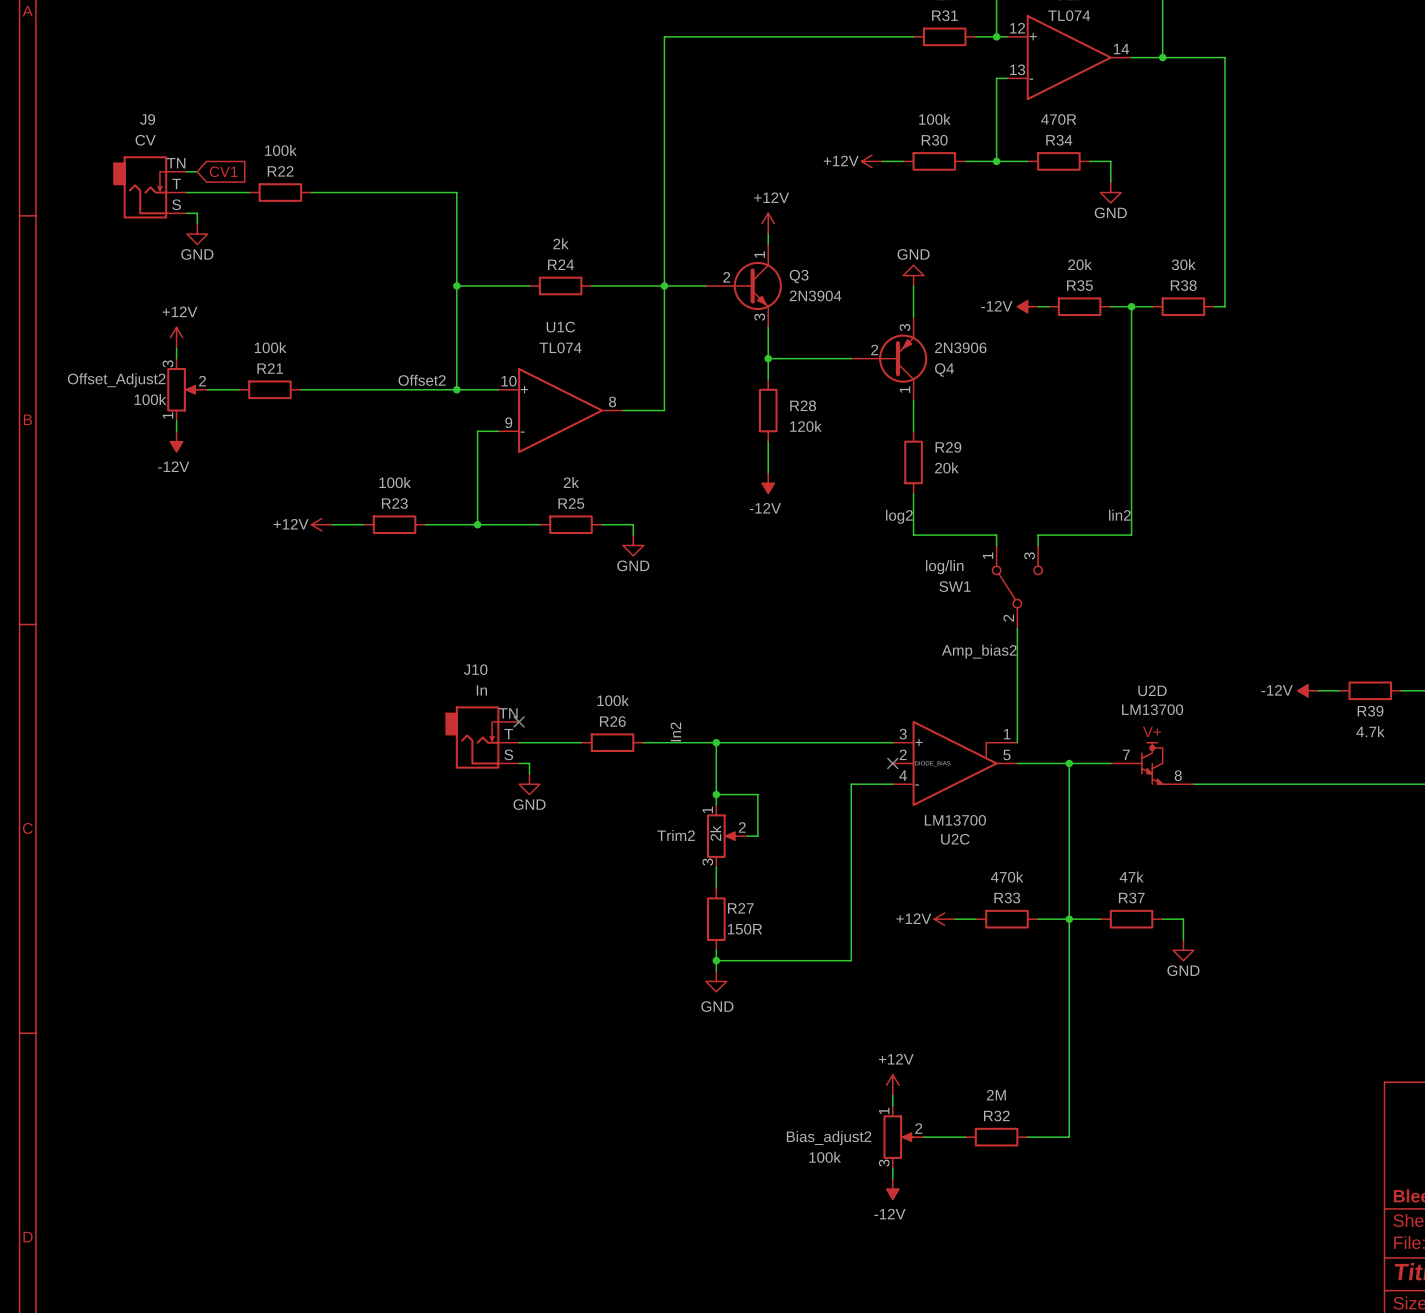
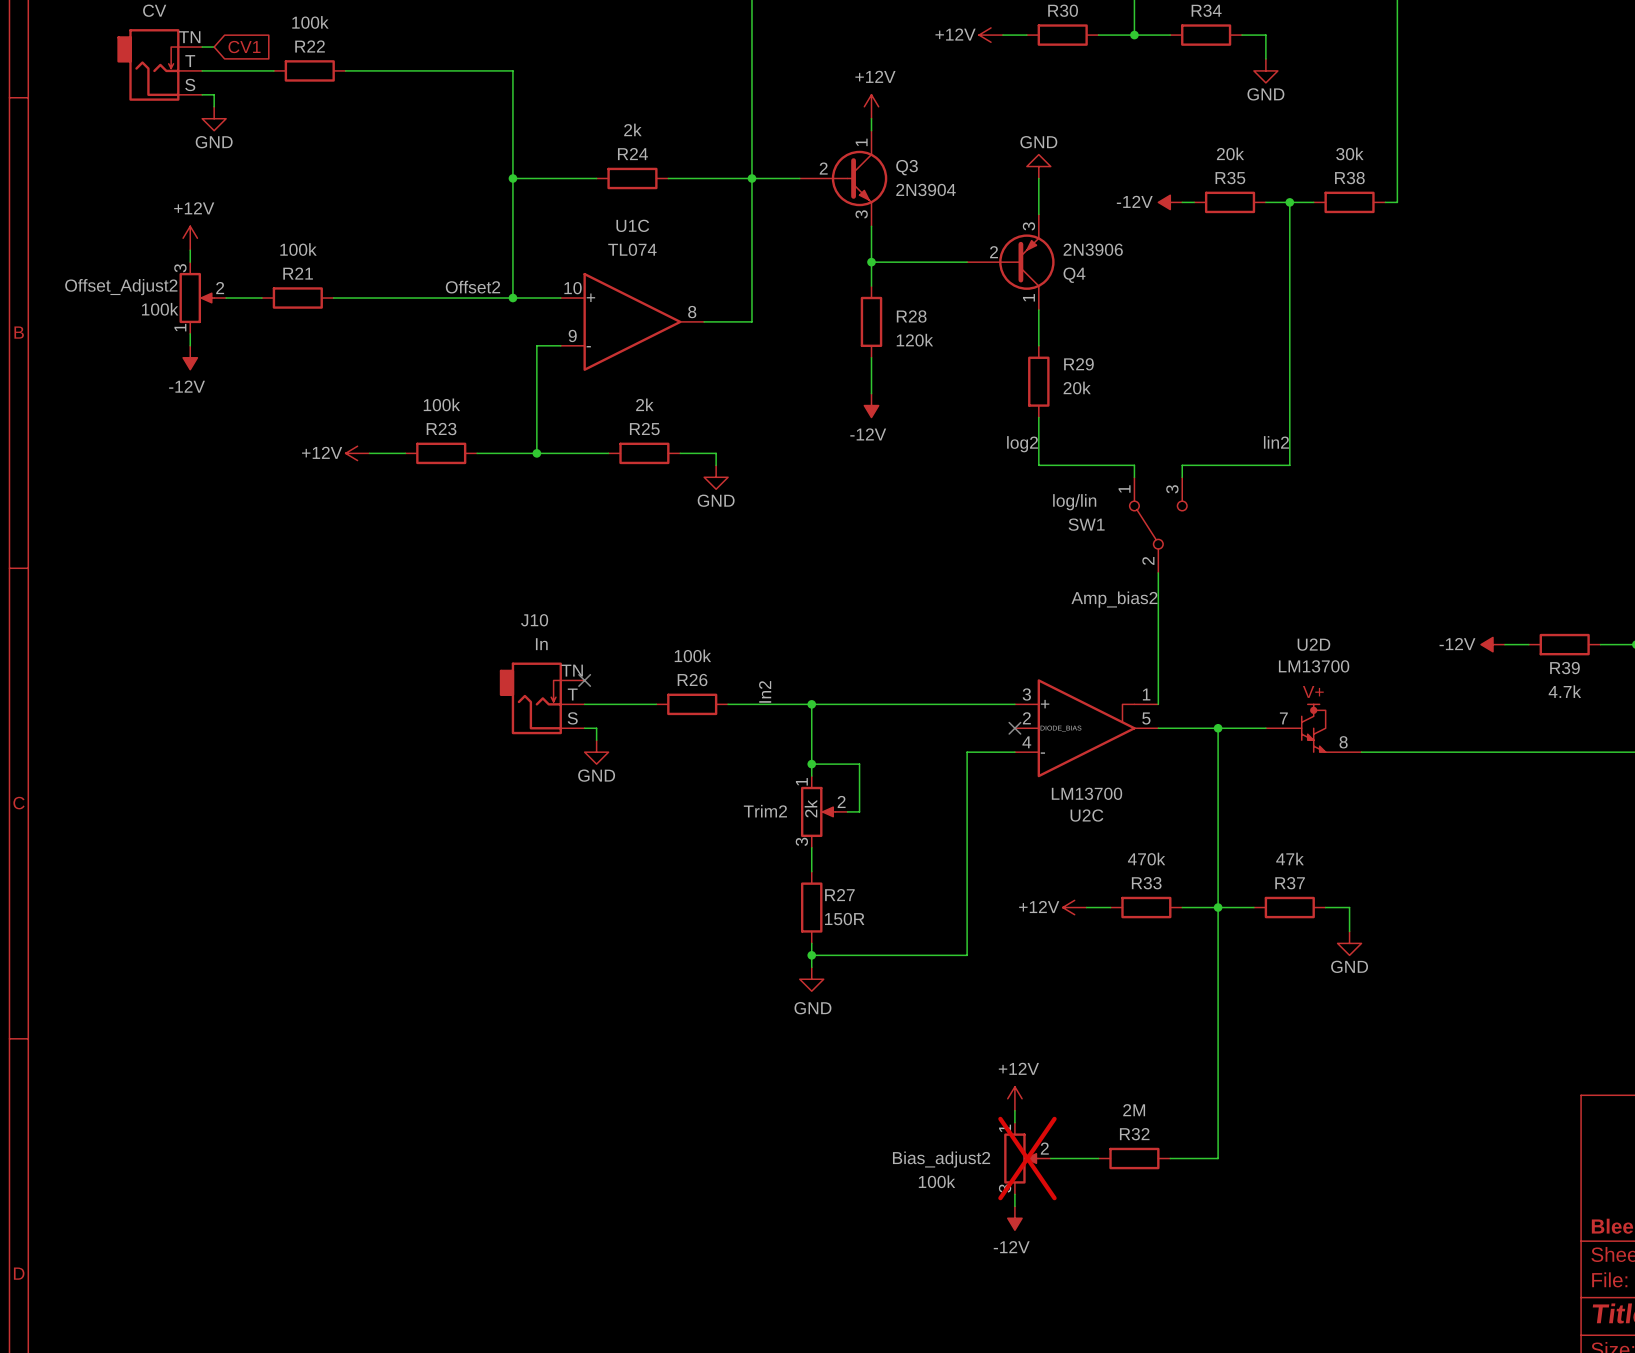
Bias_adjust2 do-not-place cross: none -> (1027, 1158)

